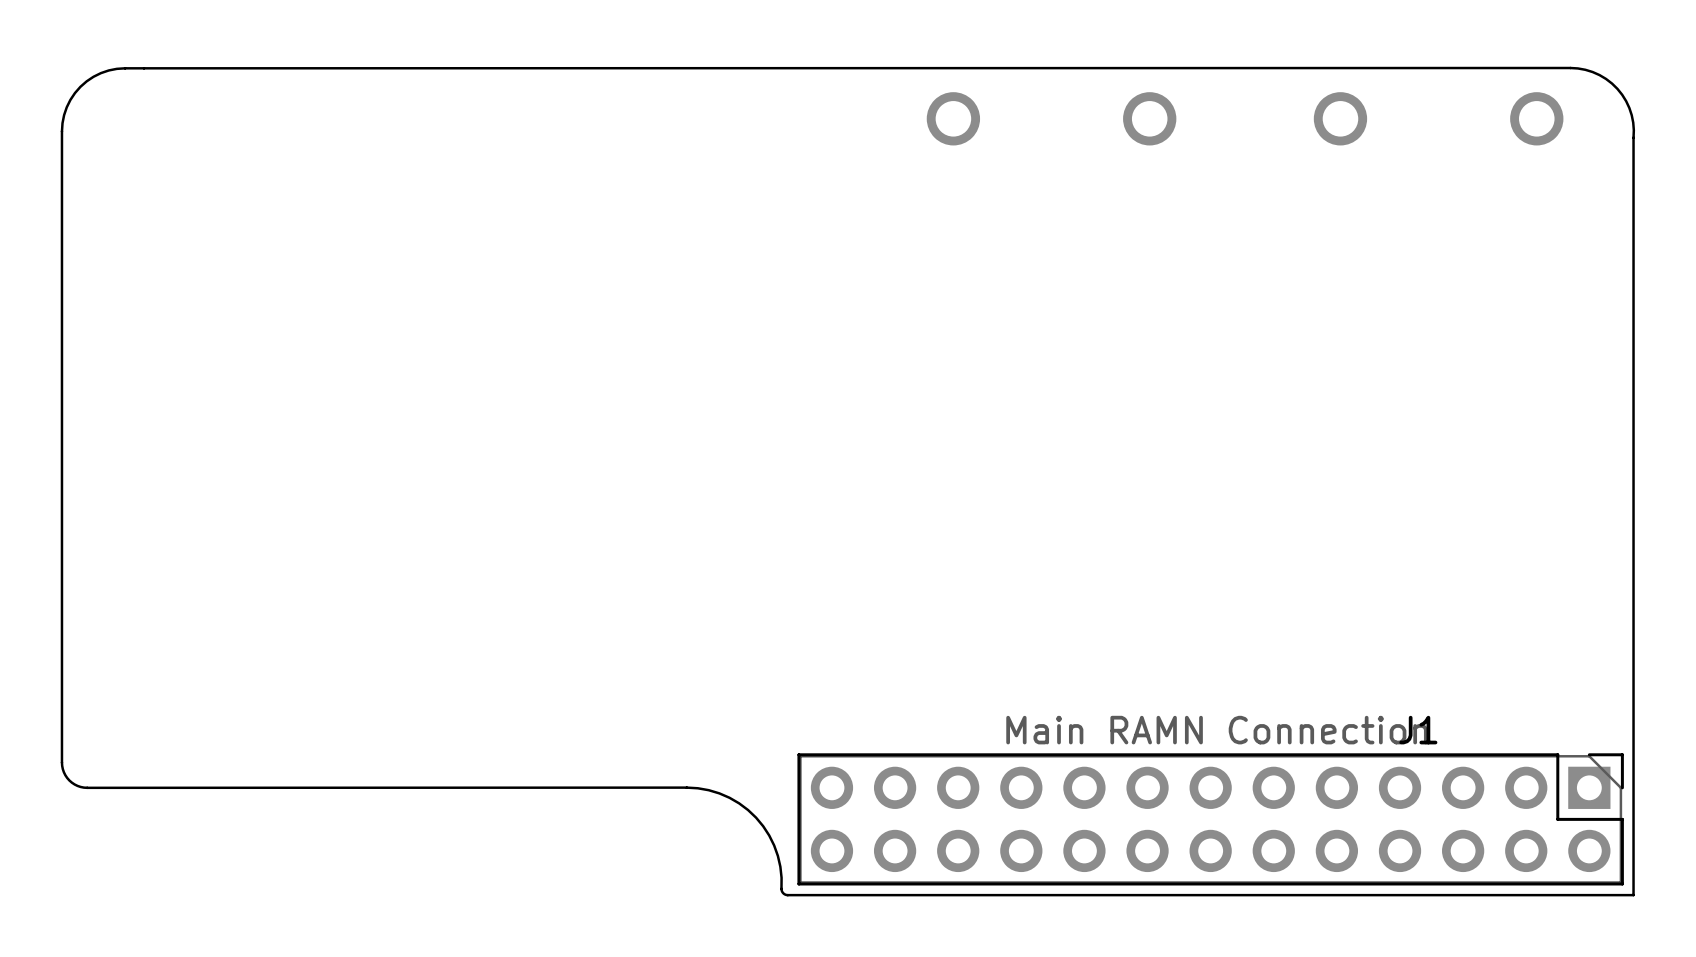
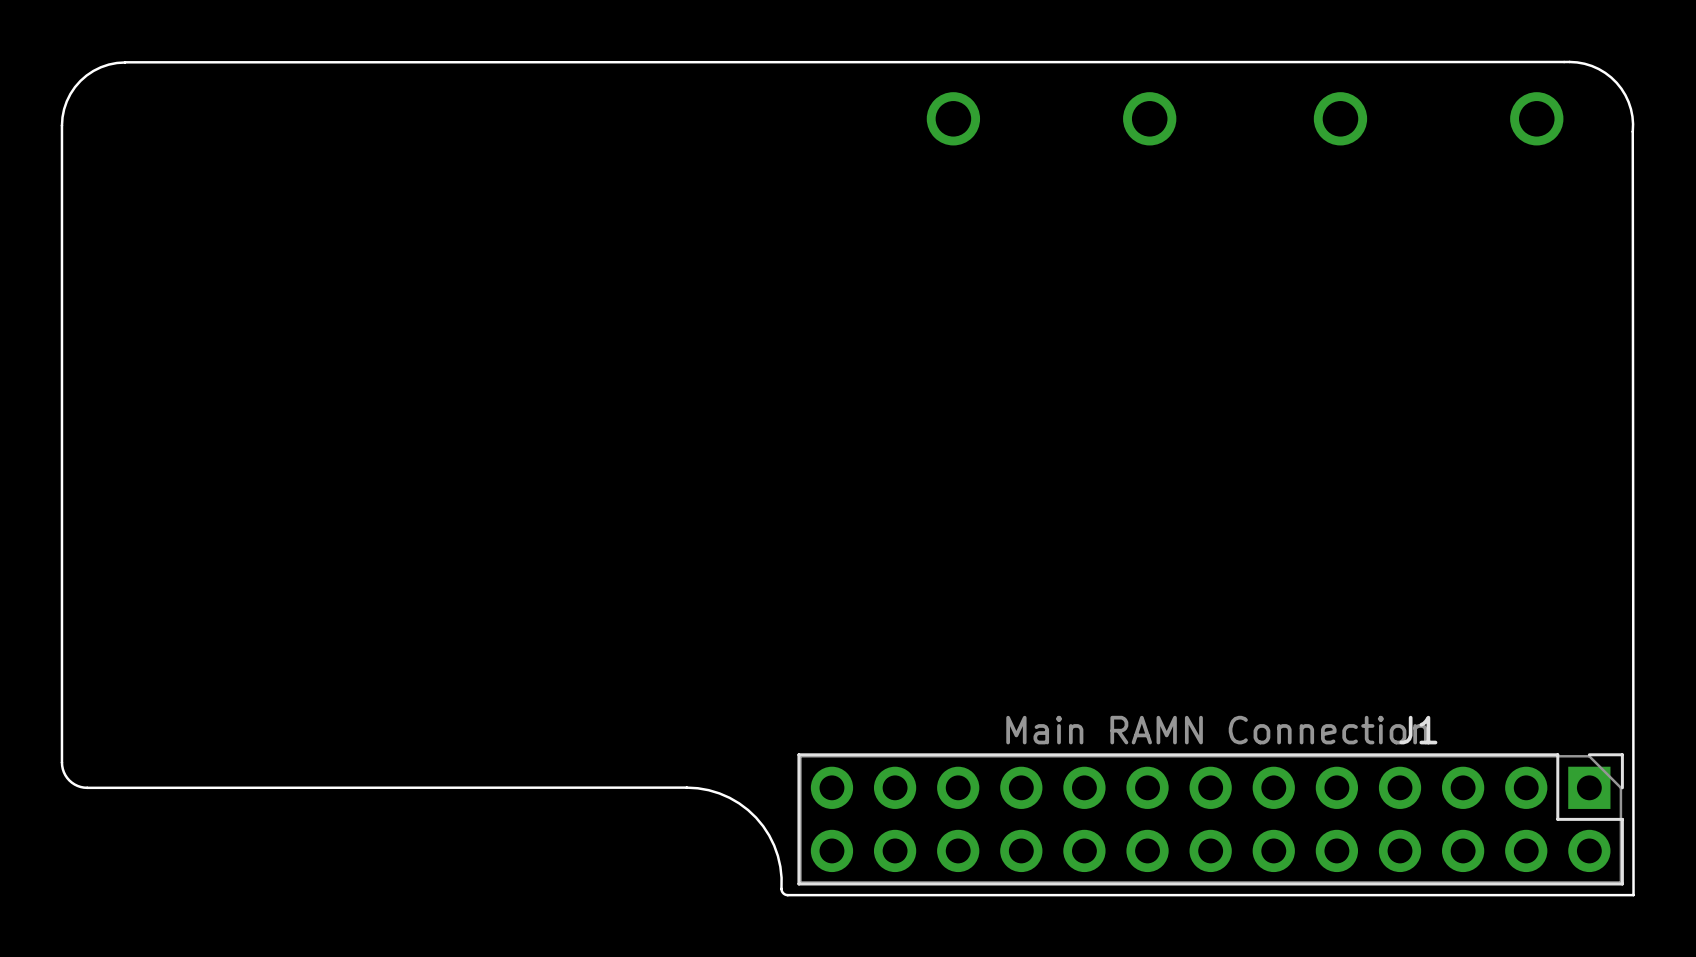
board edge: none -> (125, 62) (100, 67) (80, 80) (66, 101) (62, 117) (61, 131)
board edge: (61, 131) (66, 107) (80, 86) (100, 73) (125, 68) (1570, 68) (1585, 69) (1599, 75) (1612, 83) (1626, 101) (1631, 115) (1633, 130) (1633, 895) -> (125, 62) (1569, 61) (1584, 63) (1598, 69) (1611, 77) (1625, 95) (1630, 109) (1633, 124) (1633, 895)

